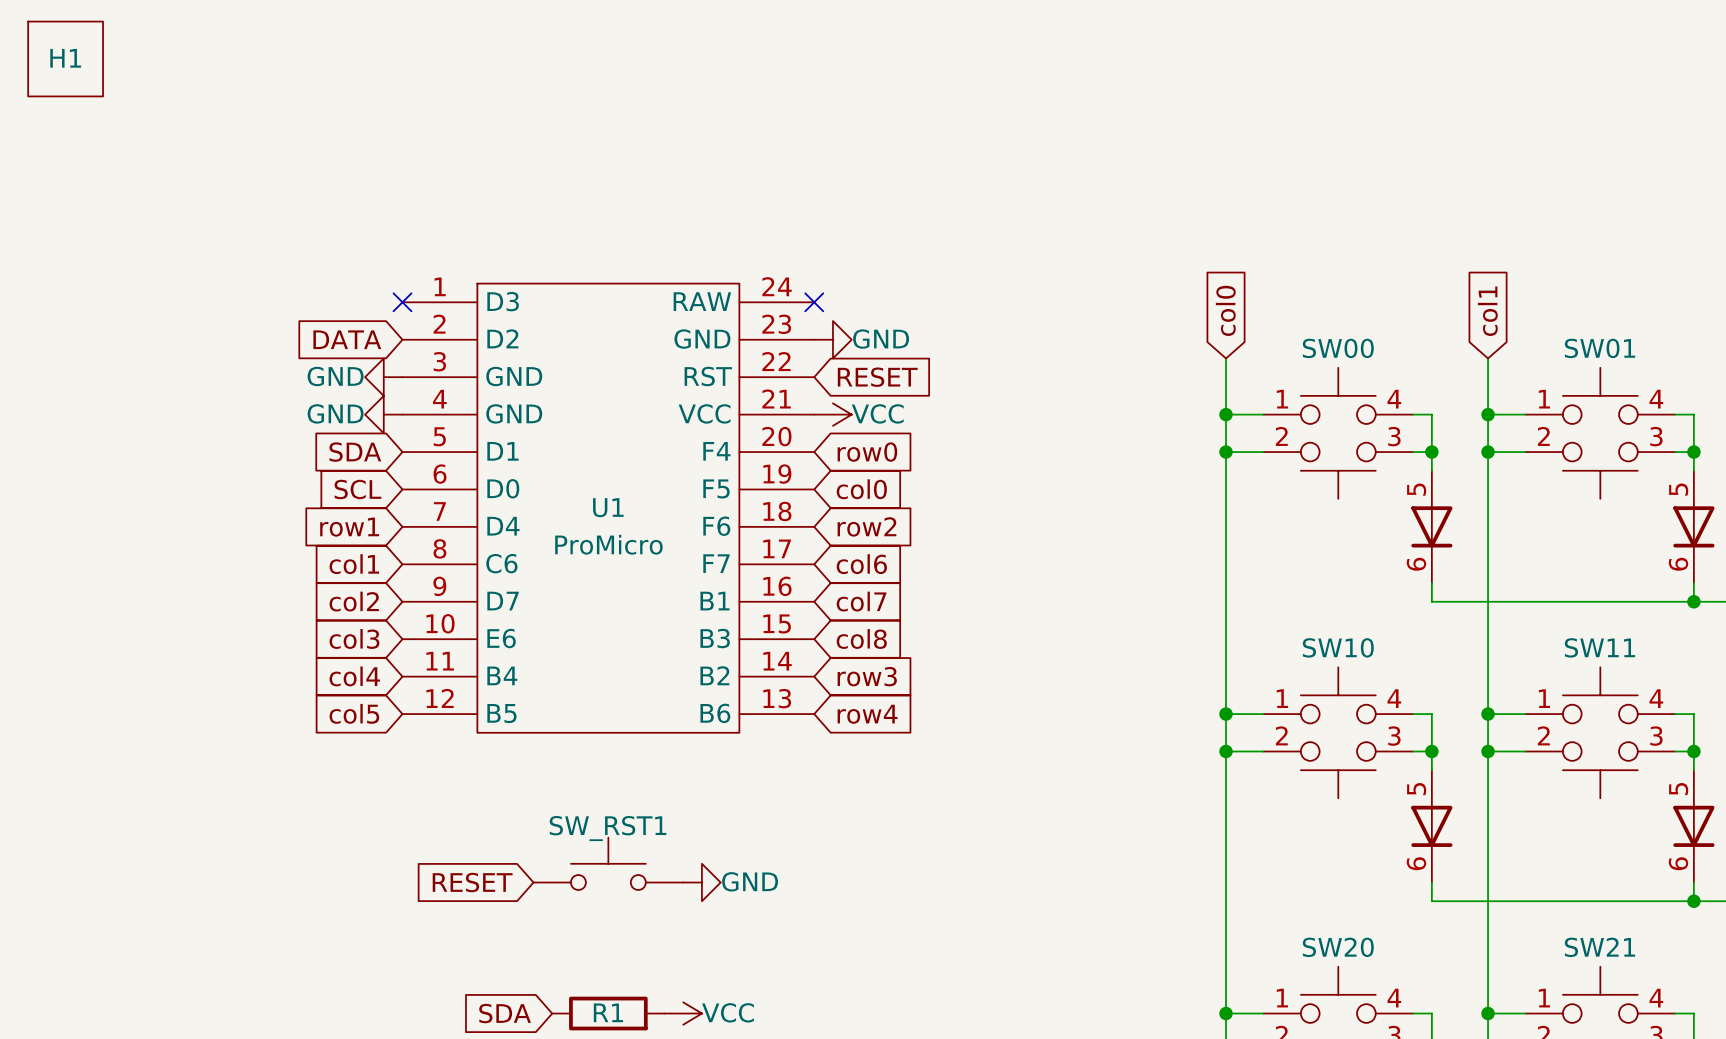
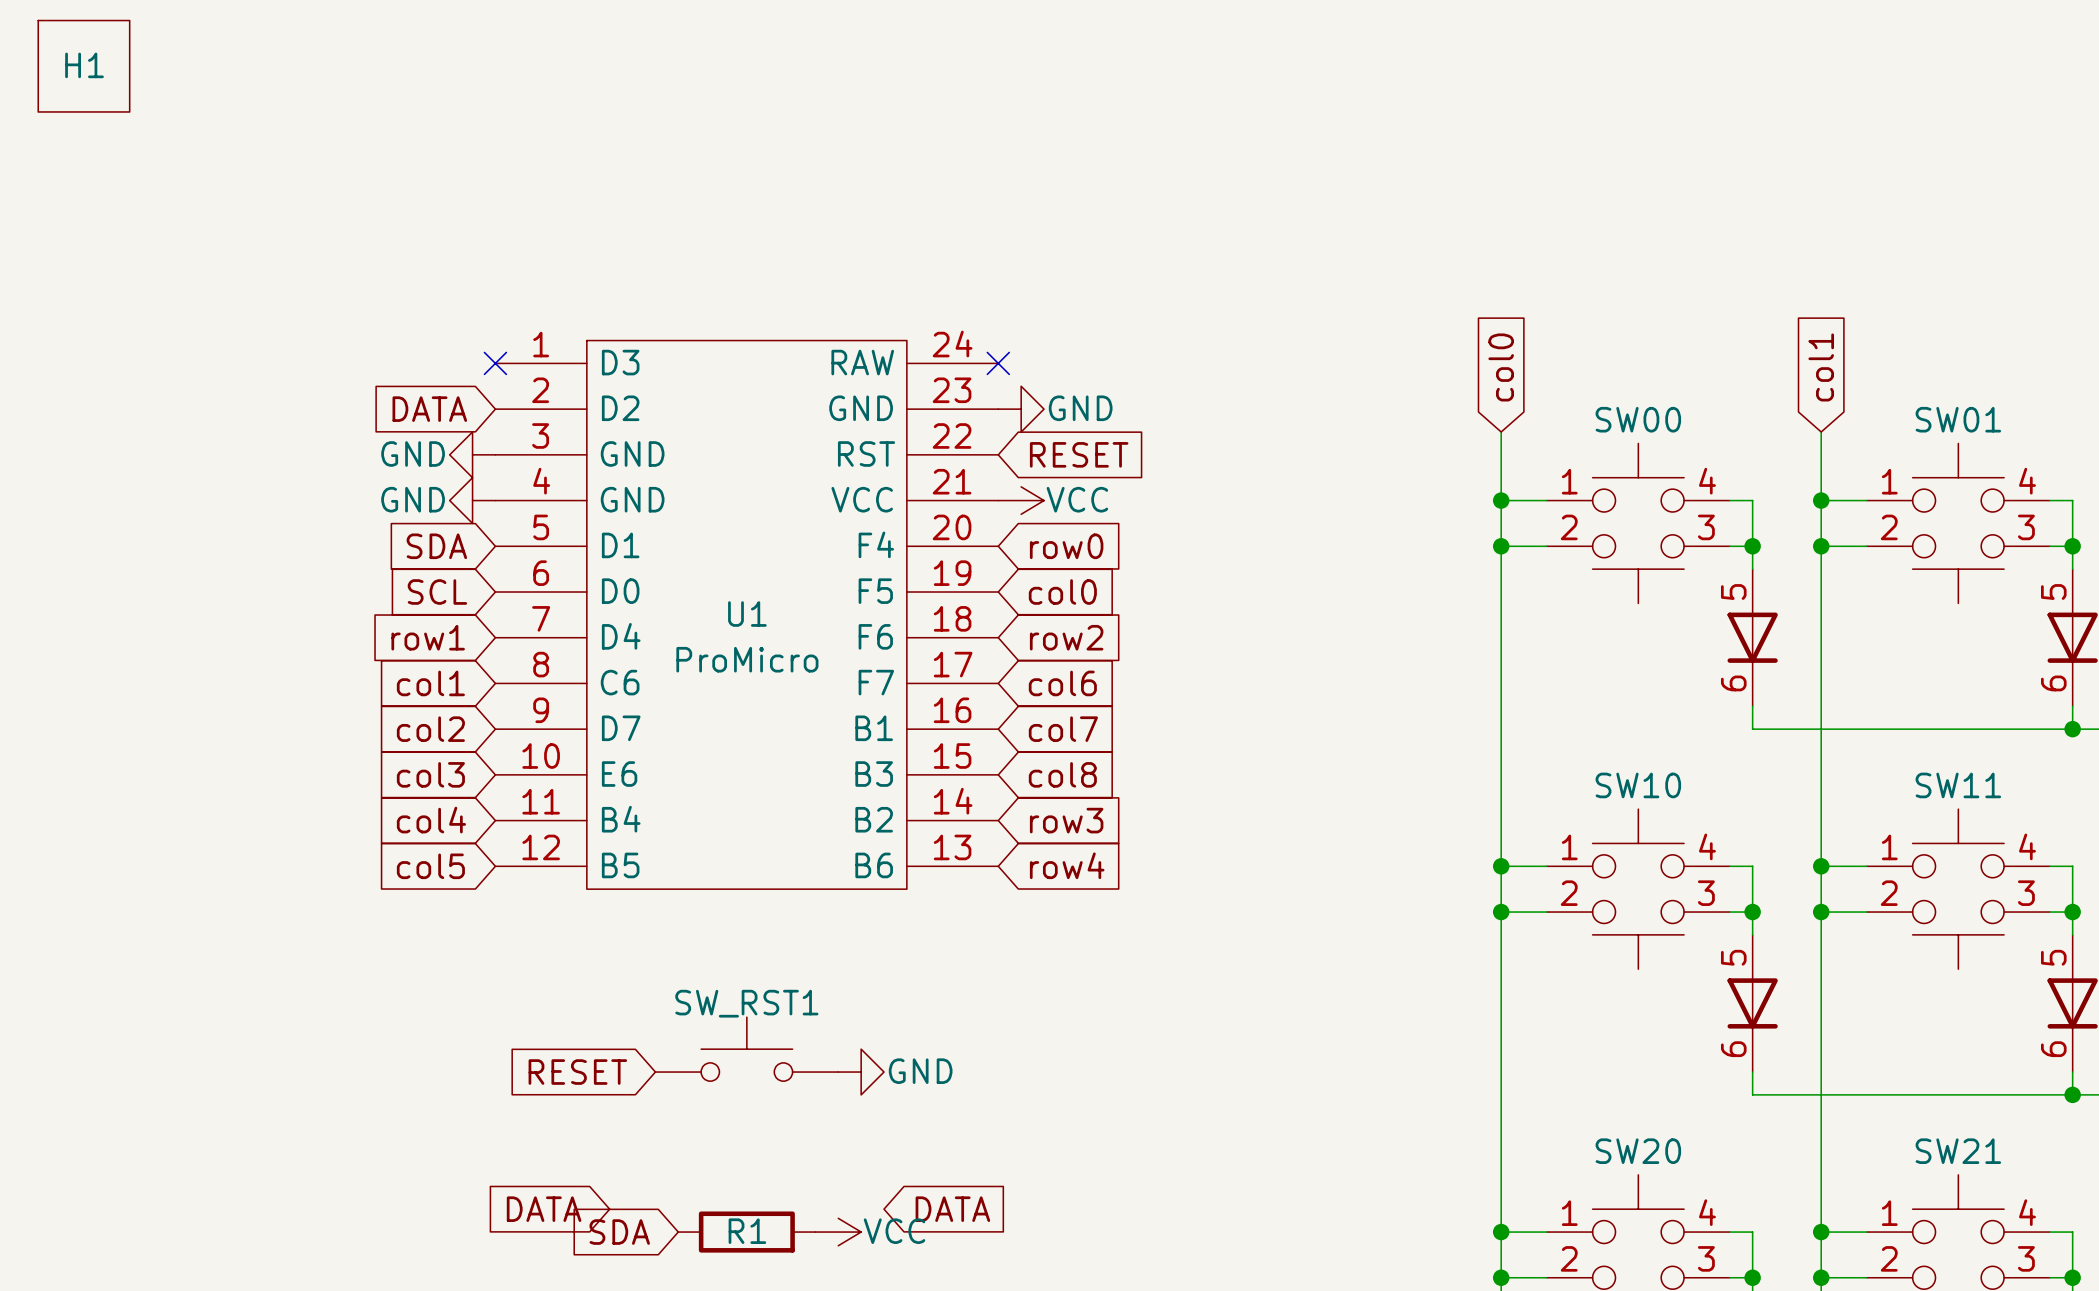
global label: none -> DATA (544, 1209)
global label: none -> DATA (952, 1209)

